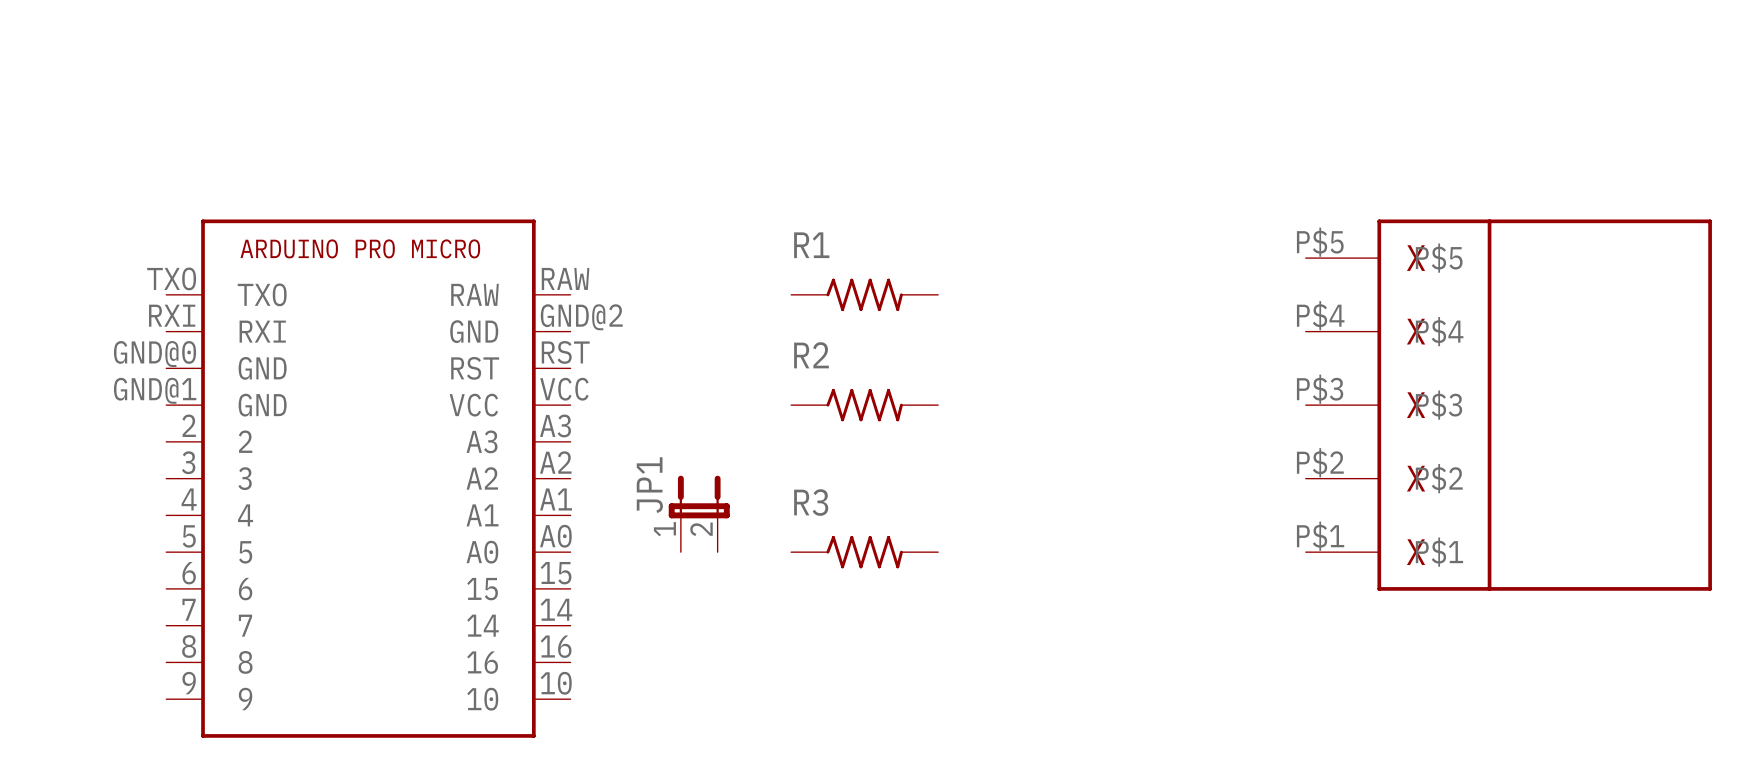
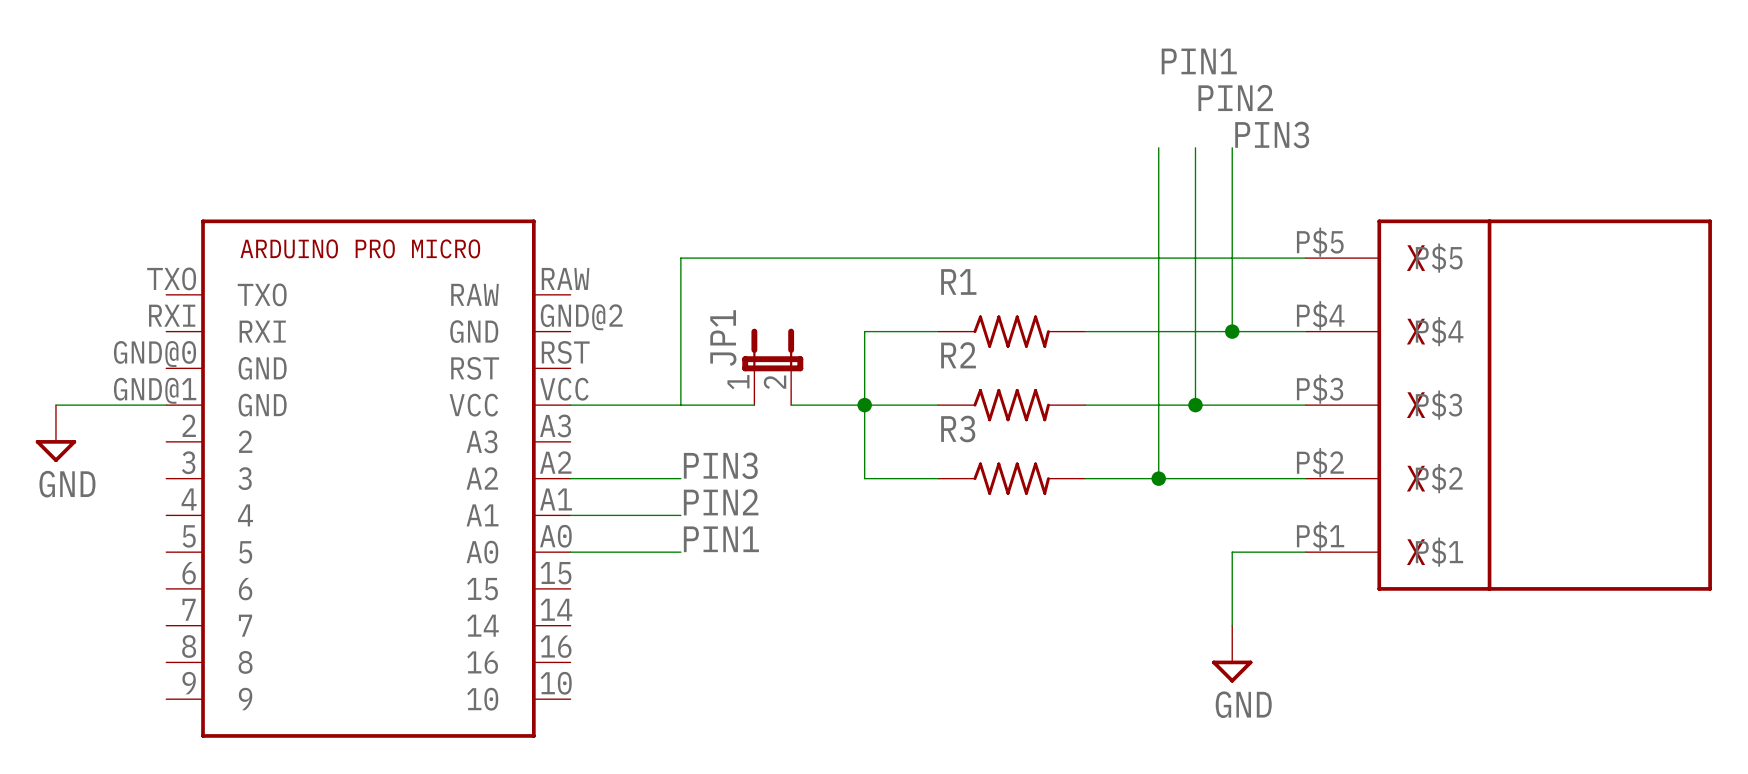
label: none -> PIN1 (1199, 61)
label: none -> PIN2 (1235, 97)
label: none -> PIN3 (1272, 134)
wire: none -> (1158, 147) (1158, 478)
wire: none -> (1195, 147) (1195, 405)
wire: none -> (1232, 147) (1232, 331)
wire: none -> (1305, 258) (680, 258) (680, 405)
R1 position: (864, 294) -> (1011, 331)
wire: none -> (938, 331) (864, 331) (864, 478) (938, 478)
wire: none -> (1085, 331) (1305, 331)
junction: none -> (1232, 331)
wire: none -> (55, 405) (166, 405)
wire: none -> (570, 405) (754, 405)
R2 position: (864, 405) -> (1011, 405)
junction: none -> (864, 405)
wire: none -> (1085, 405) (1305, 405)
junction: none -> (1195, 405)
power symbol: none -> GND (55, 433)
label: none -> PIN3 (720, 465)
wire: none -> (570, 478) (680, 478)
wire: none -> (1085, 478) (1305, 478)
junction: none -> (1158, 478)
label: none -> PIN2 (721, 502)
JP1 position: (699, 513) -> (772, 366)
wire: none -> (570, 515) (680, 515)
label: none -> PIN1 (721, 539)
wire: none -> (570, 552) (680, 552)
R3 position: (864, 552) -> (1011, 478)
wire: none -> (1305, 552) (1232, 552) (1232, 625)
power symbol: none -> GND (1232, 654)

